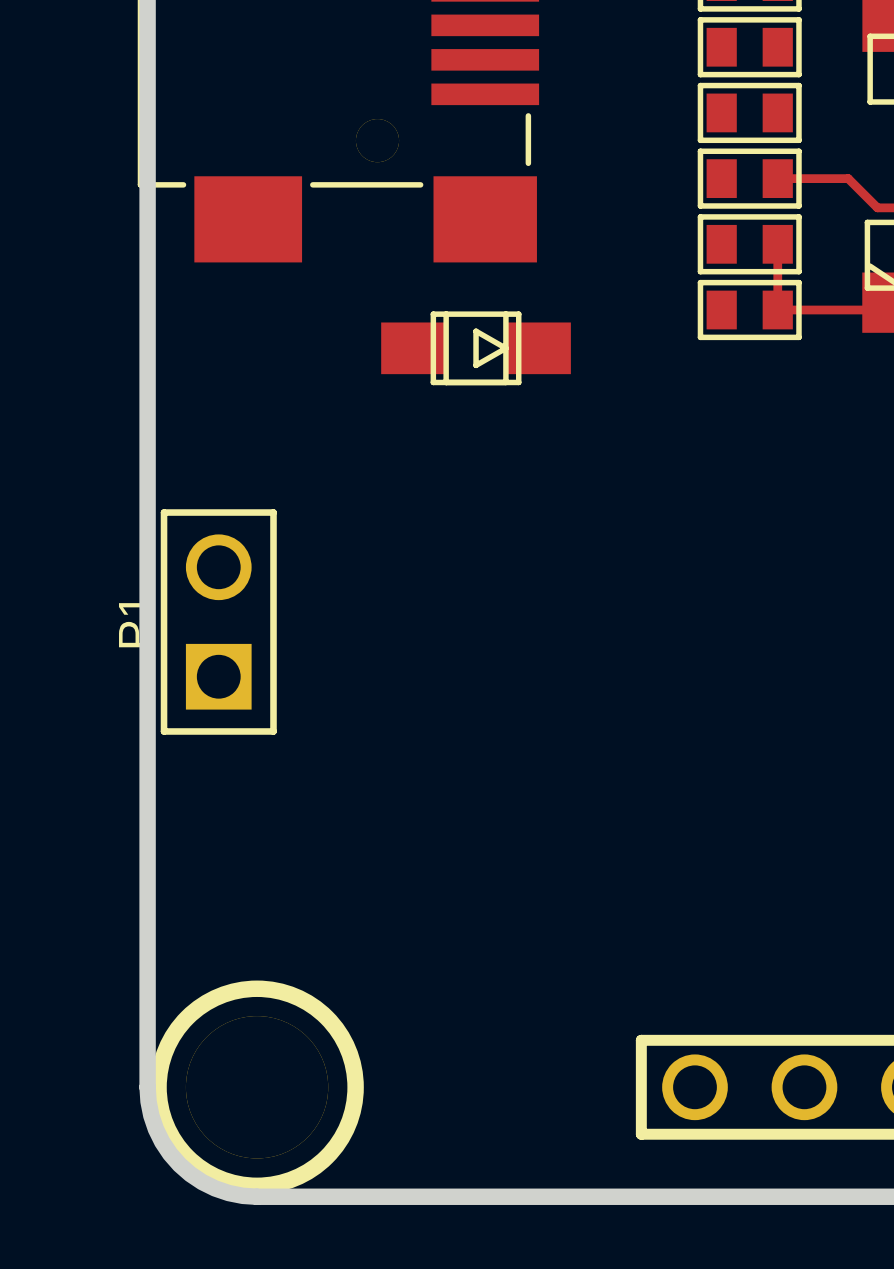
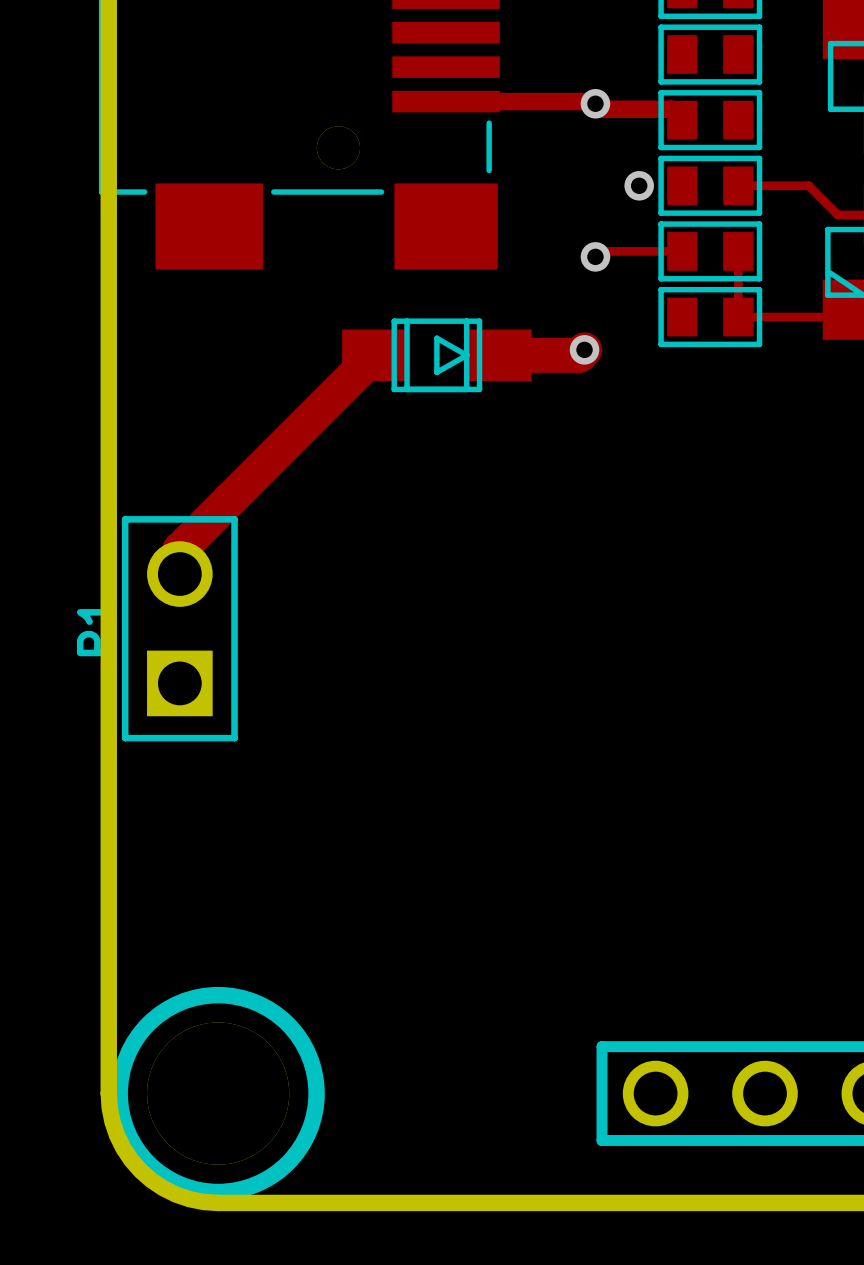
track: none -> (446, 101) (593, 101) (600, 109) (671, 109) (682, 120)
via: none -> (595, 103)
via: none -> (639, 185)
track: none -> (682, 251) (600, 251) (595, 256)
via: none -> (595, 256)
track: none -> (584, 349) (579, 355) (499, 355)
via: none -> (584, 349)
track: none -> (374, 355) (179, 549) (179, 574)

